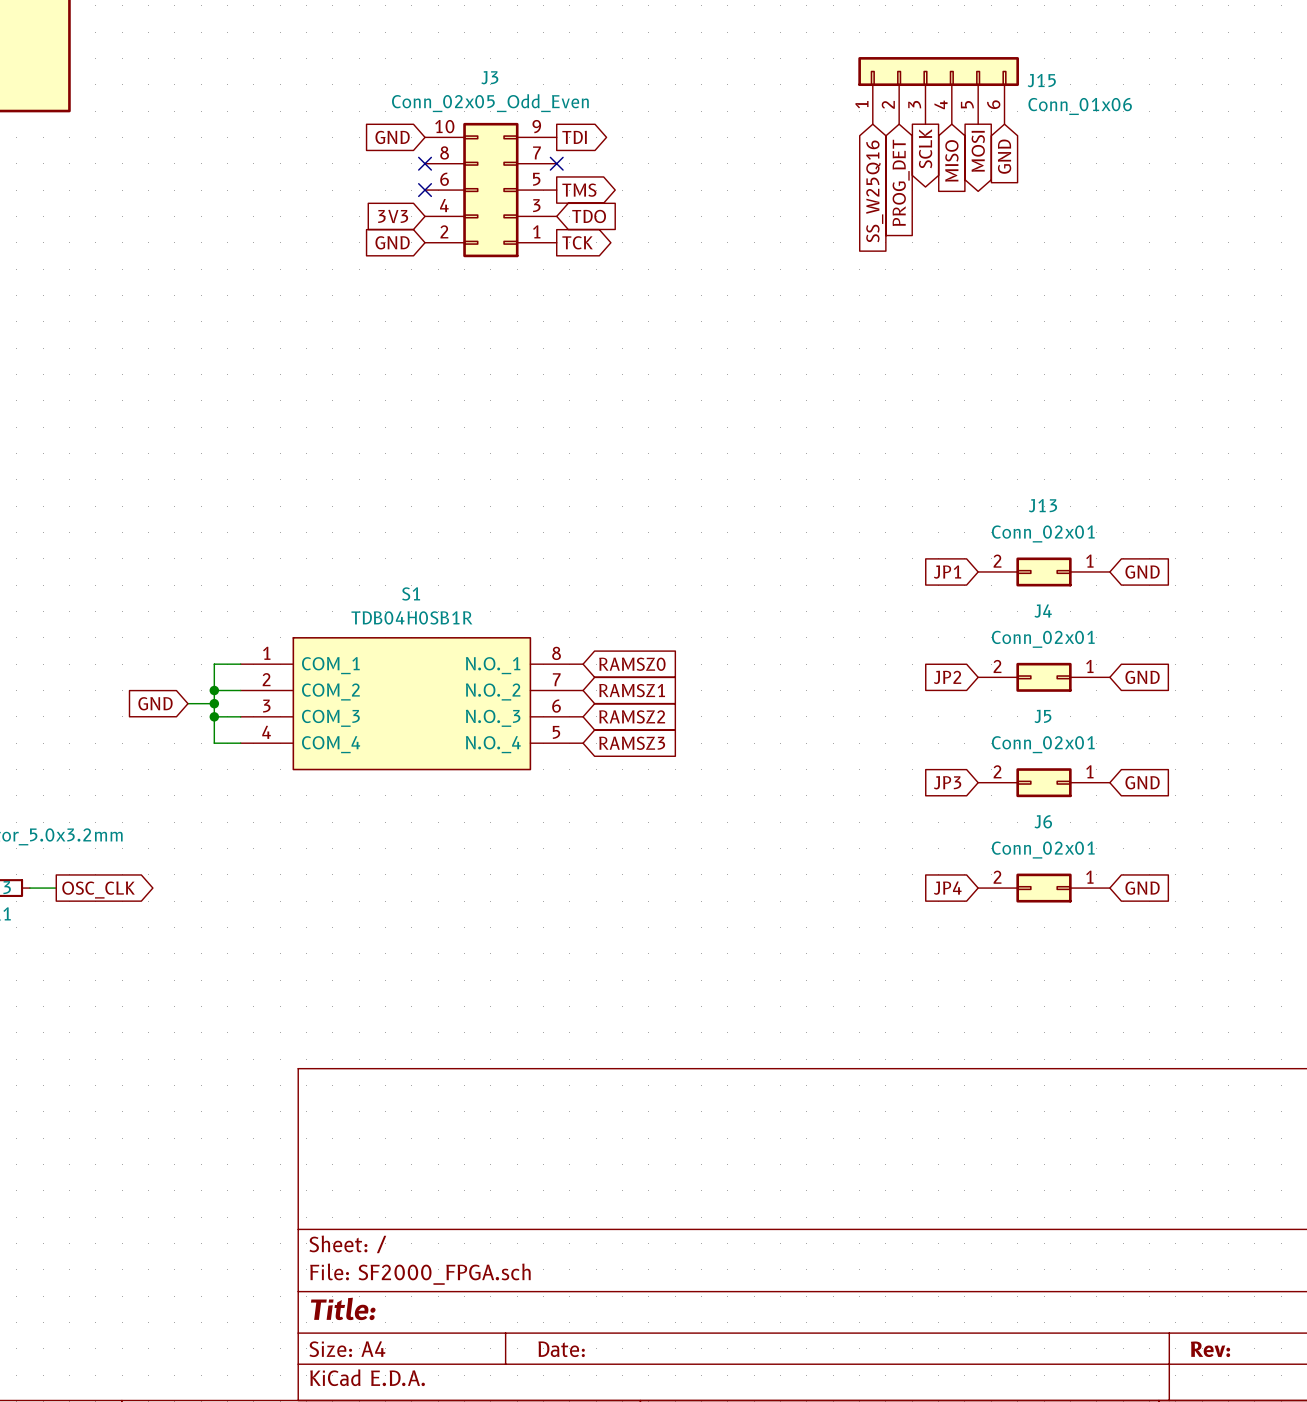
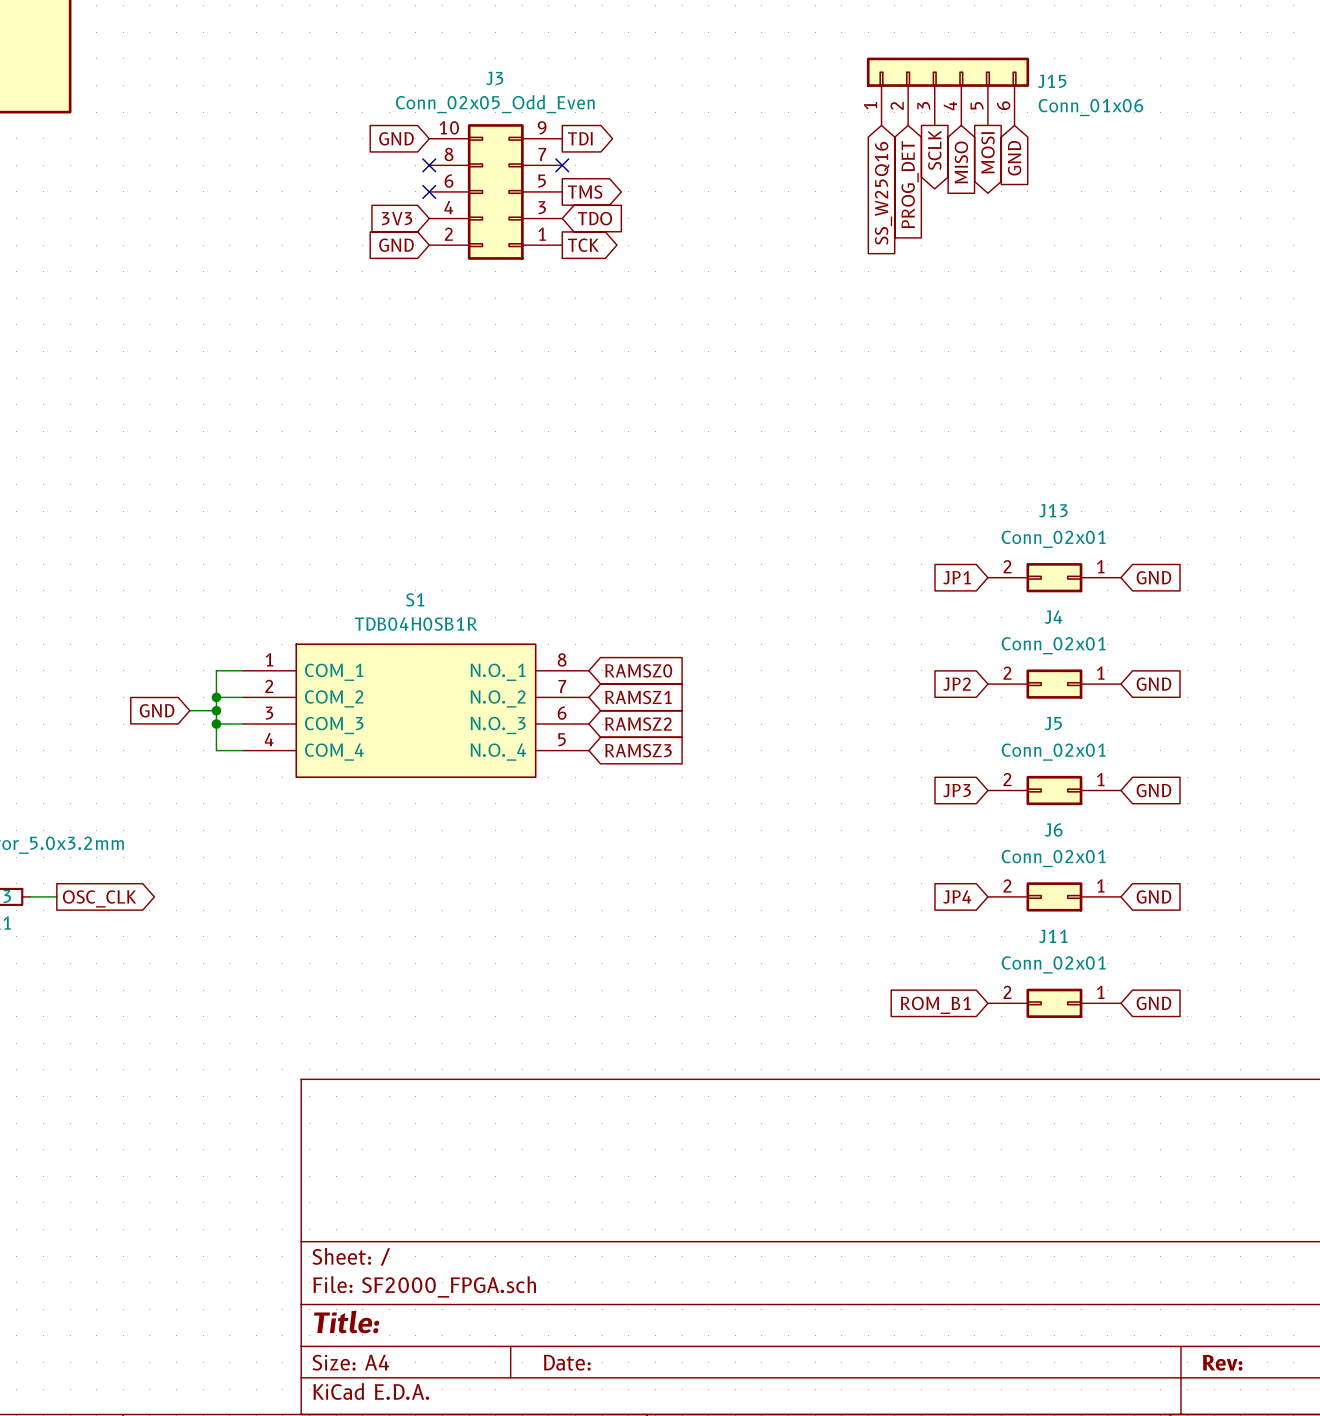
J11: none -> Conn_02x01 (1054, 1003)
global label: none -> GND (1153, 1003)
global label: none -> ROM_B1 (935, 1005)

